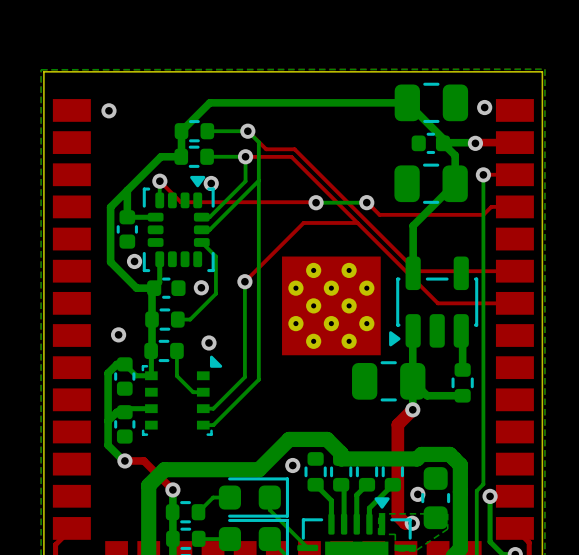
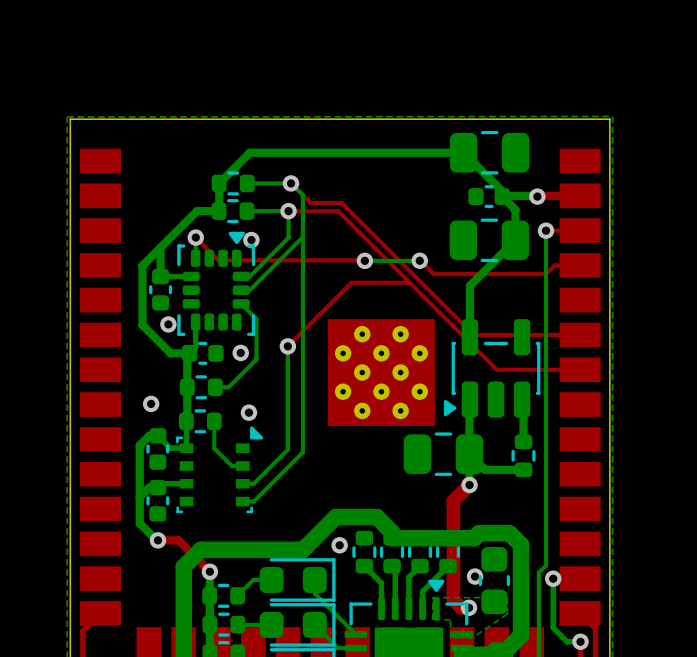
via: (484, 107) -> none
via: (108, 110) -> none

